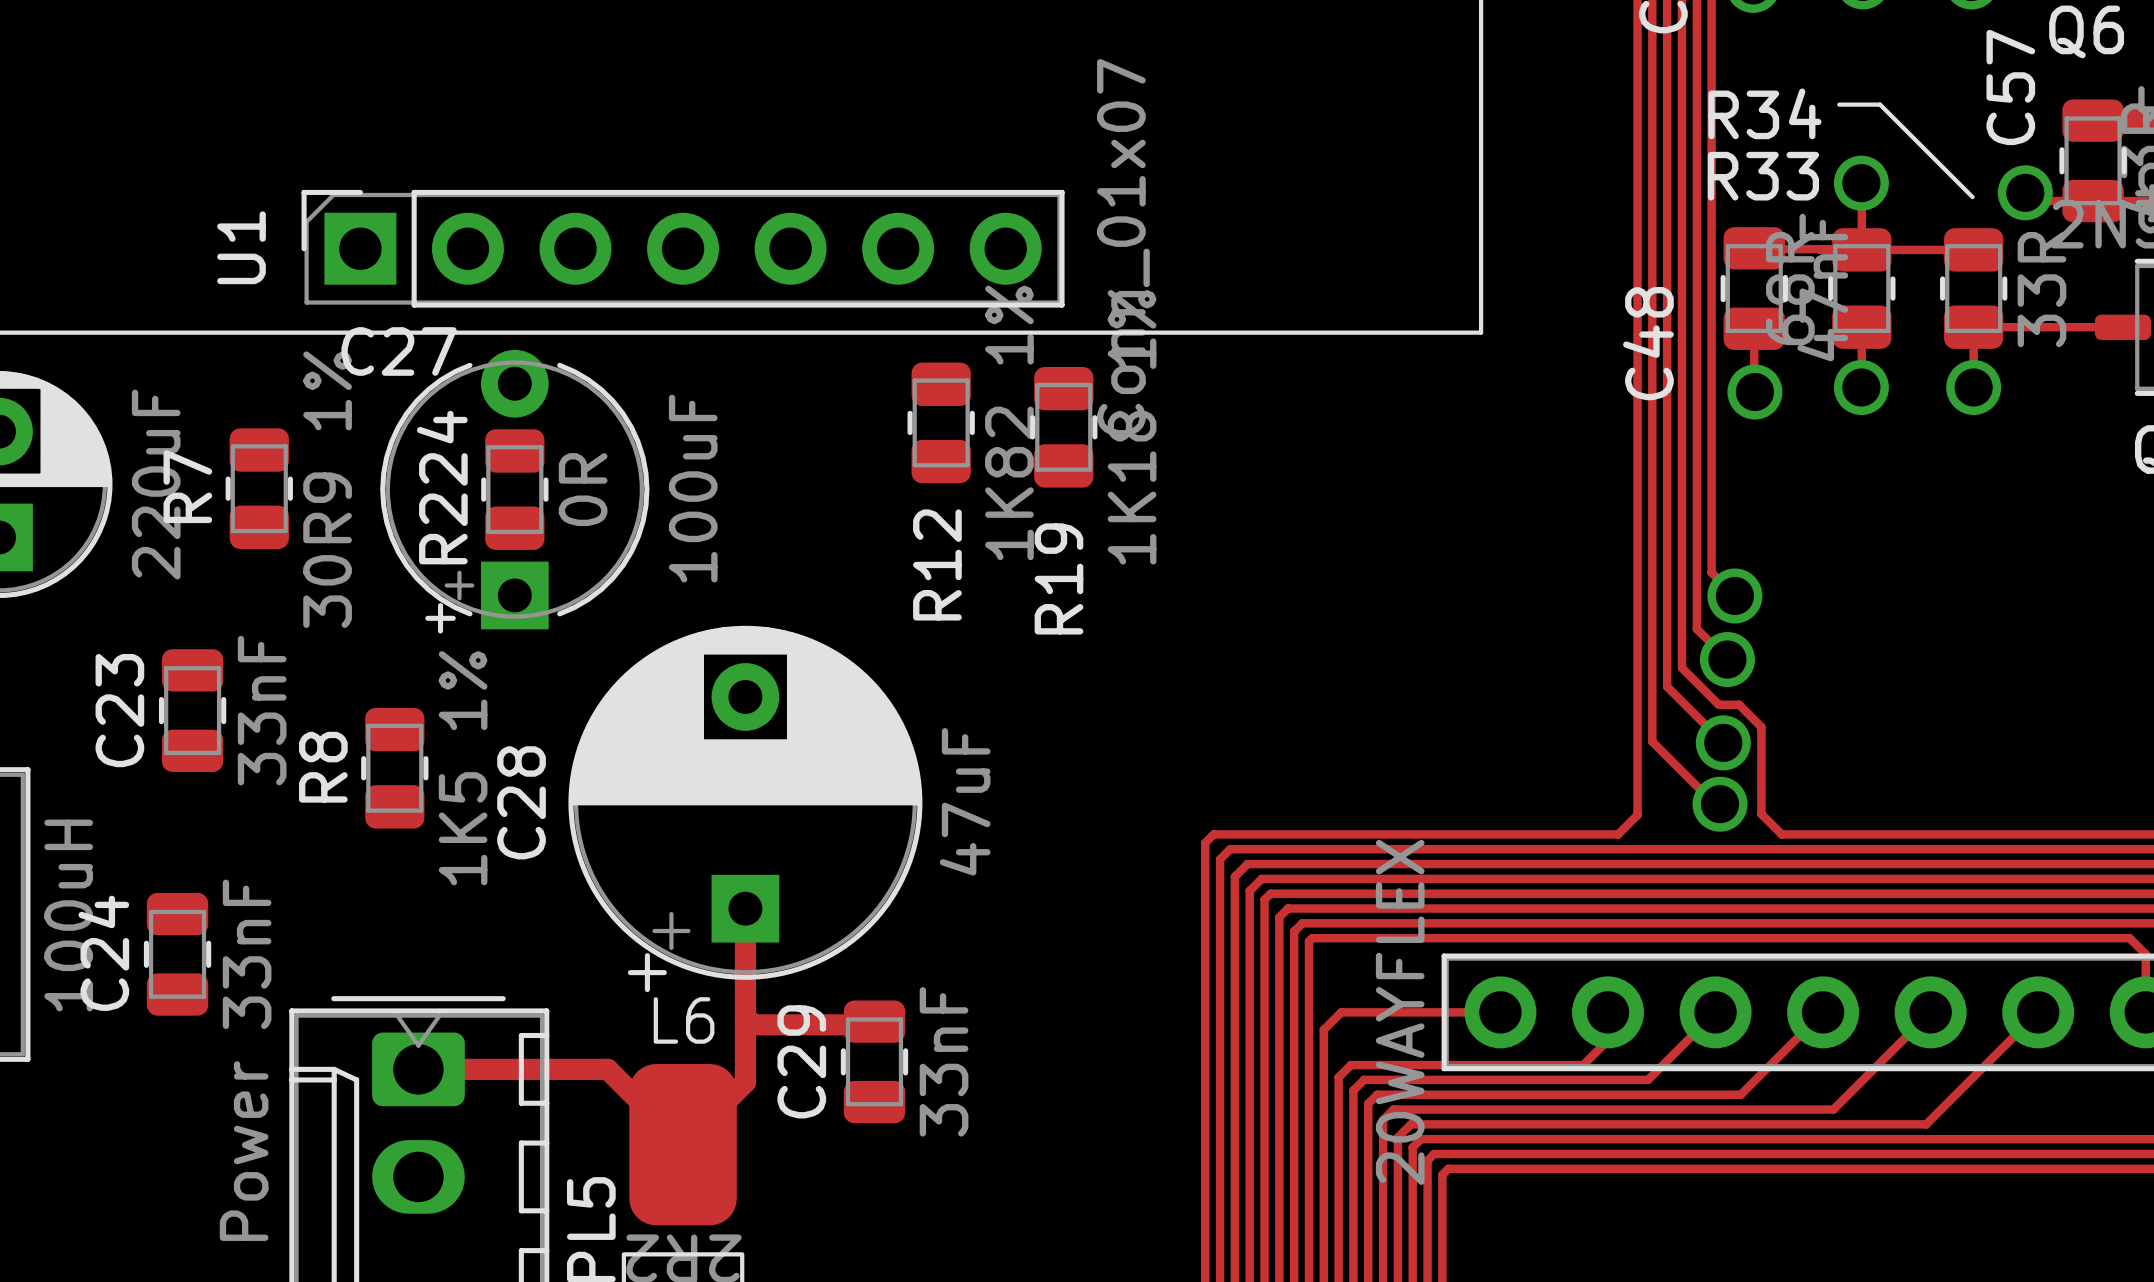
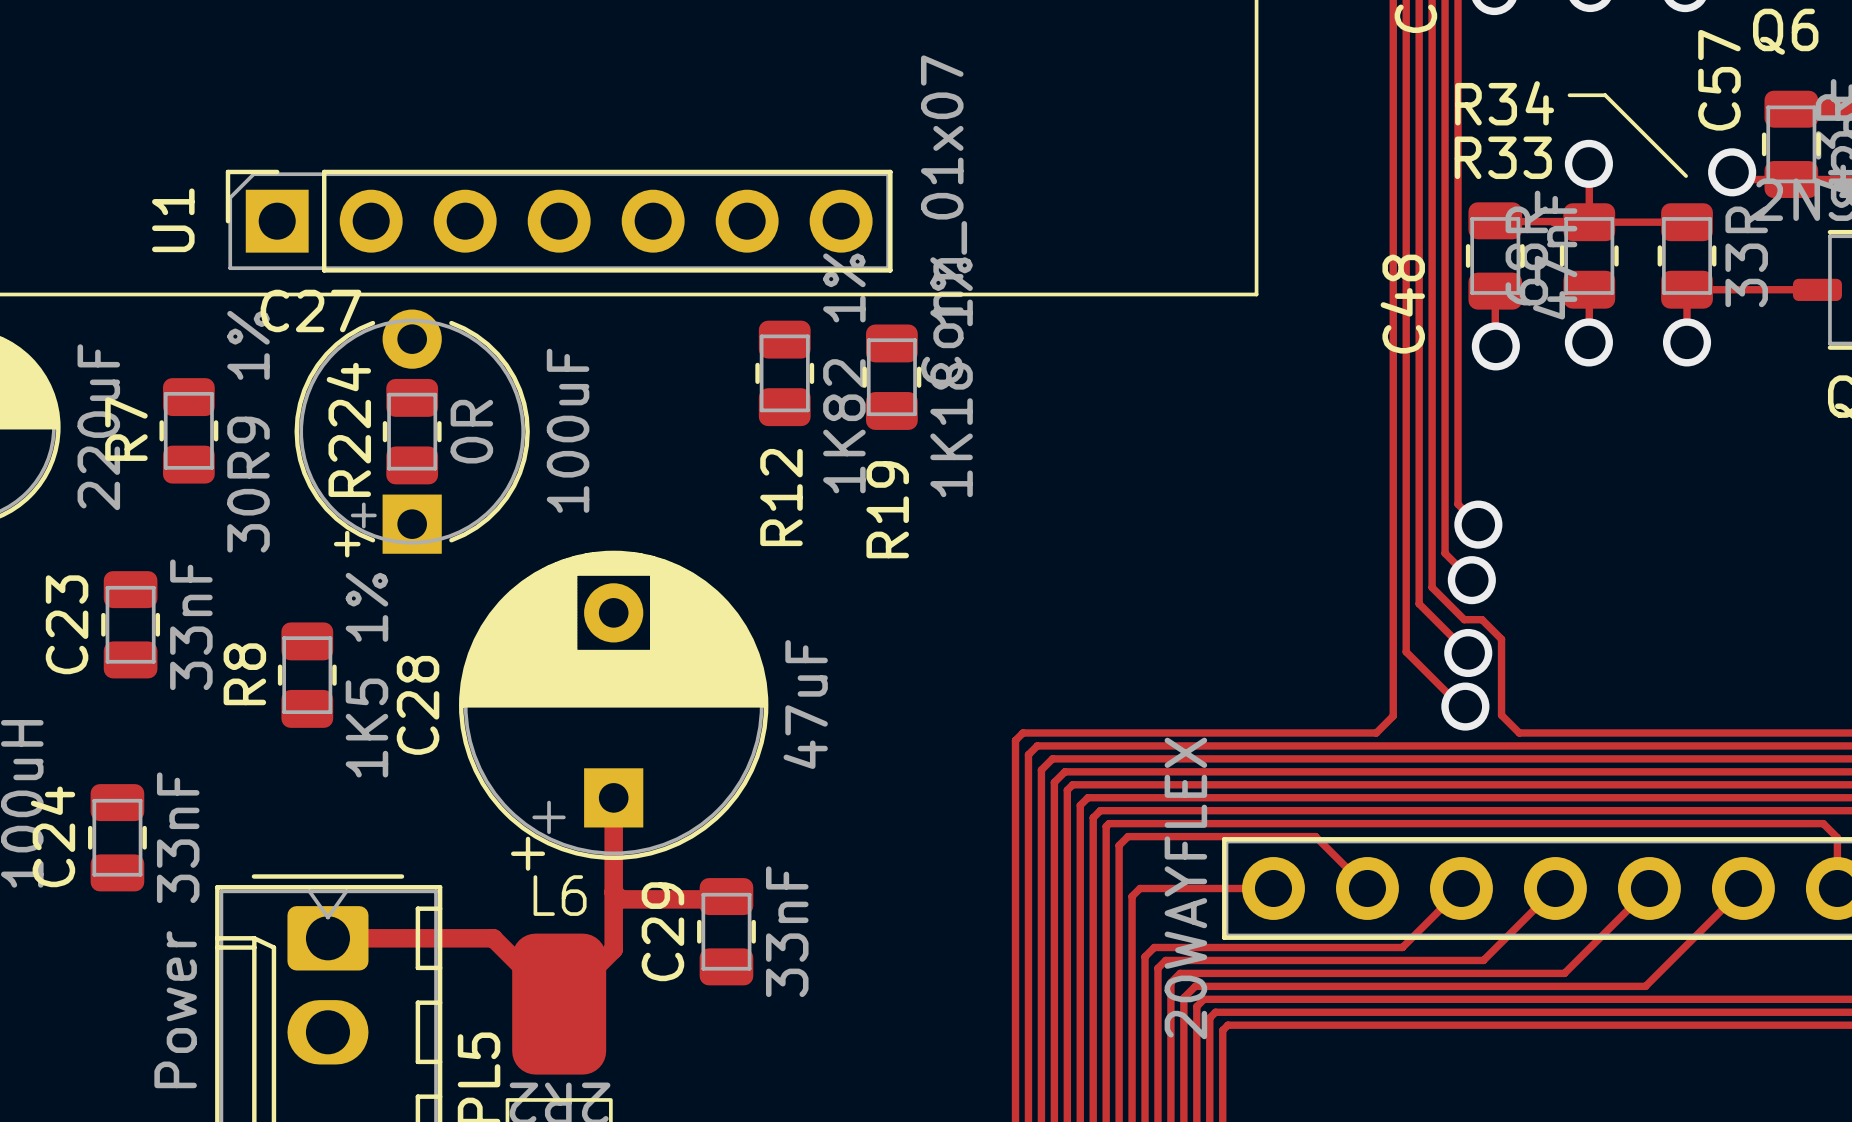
track: (1347, 1012) (1341, 1012) (1323, 1029) -> (1140, 888) (1132, 896) (1132, 945)
track: (1608, 1012) (1608, 1040) (1583, 1065) (1350, 1065) (1338, 1077) -> (1367, 888) (1315, 836) (1128, 836) (1119, 845) (1119, 903)

